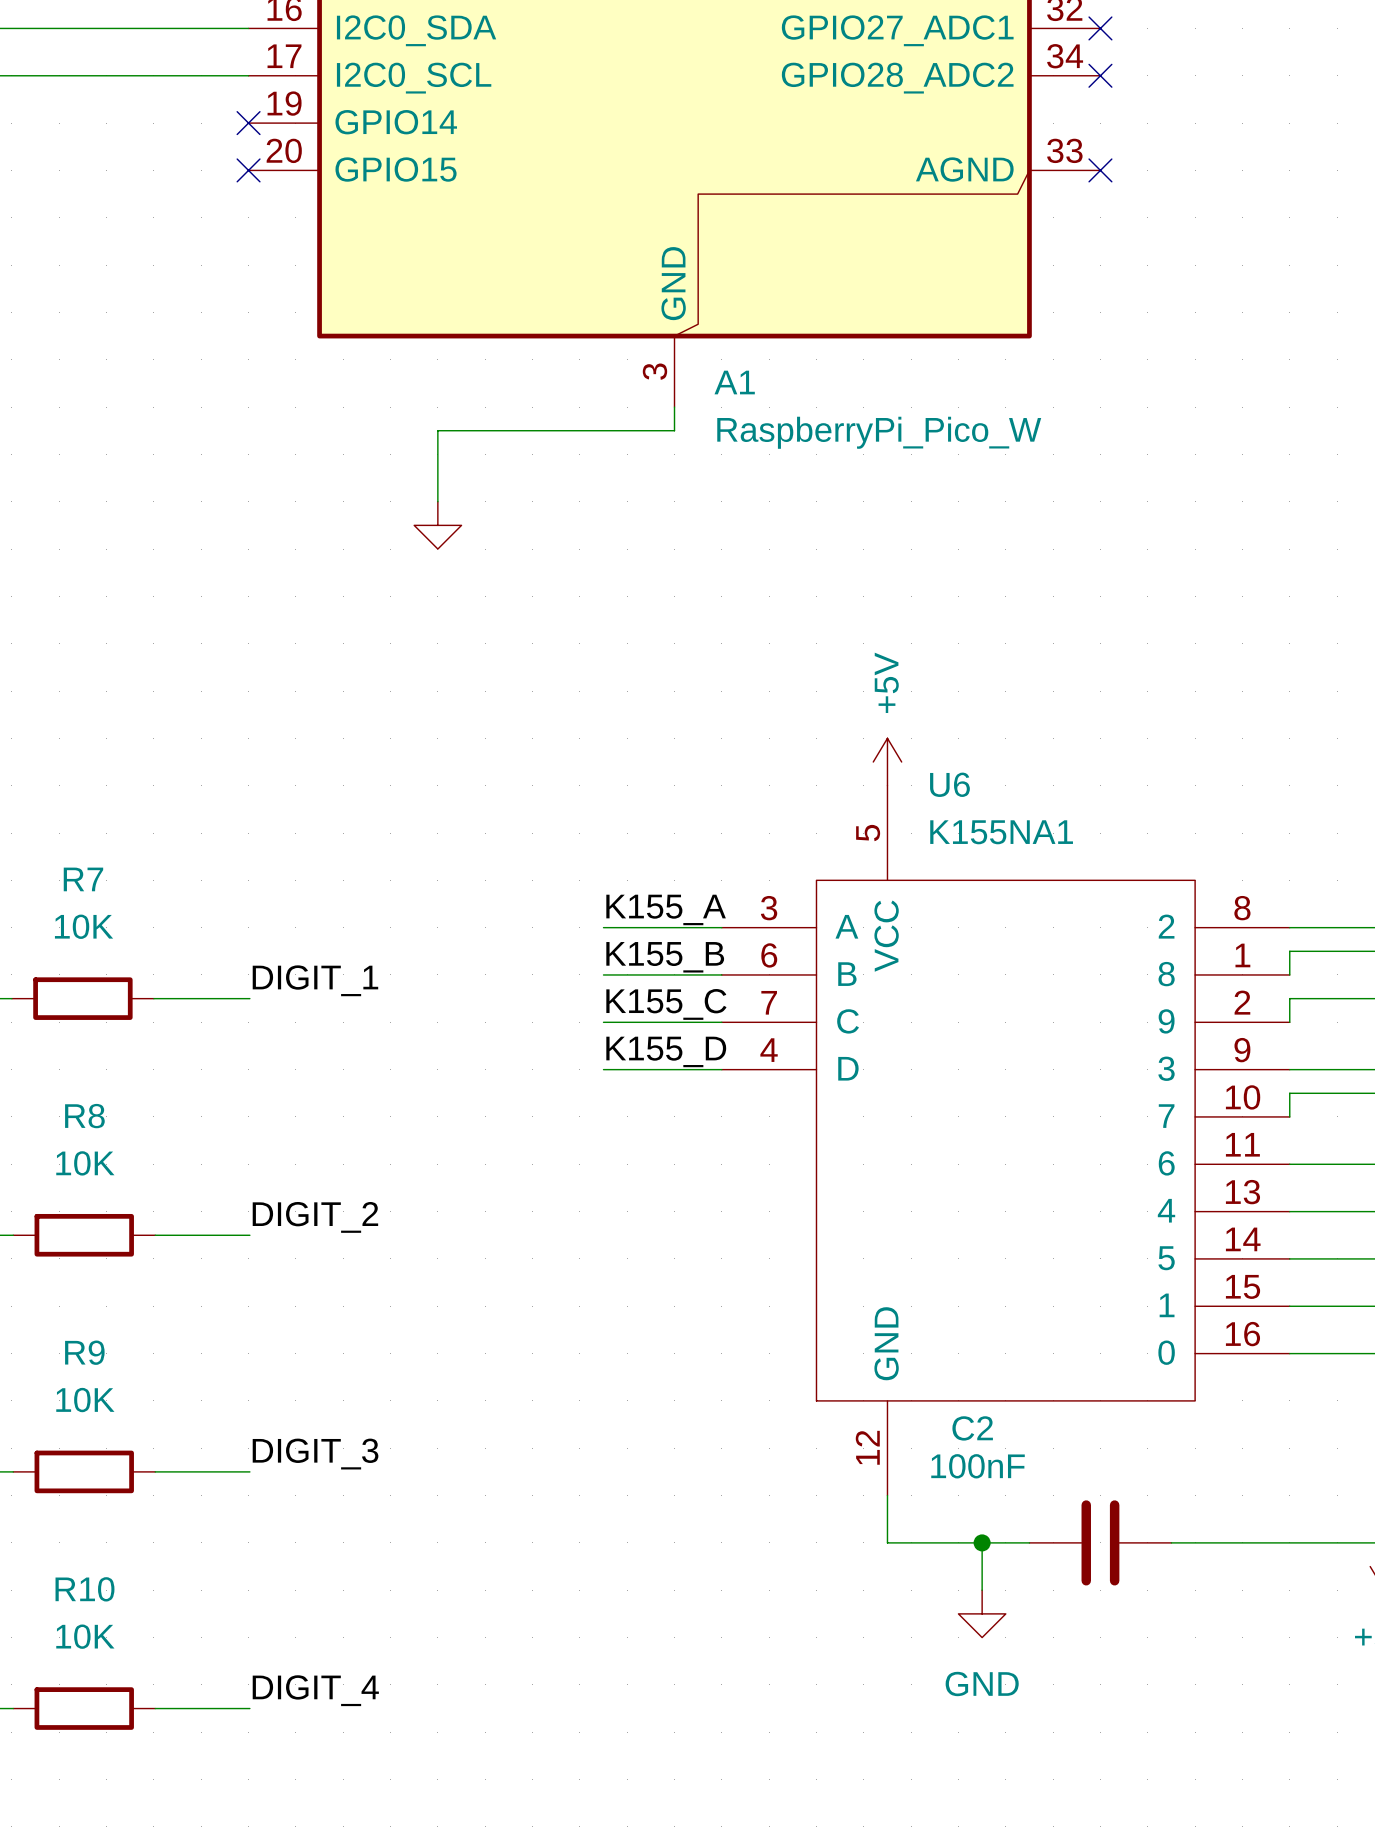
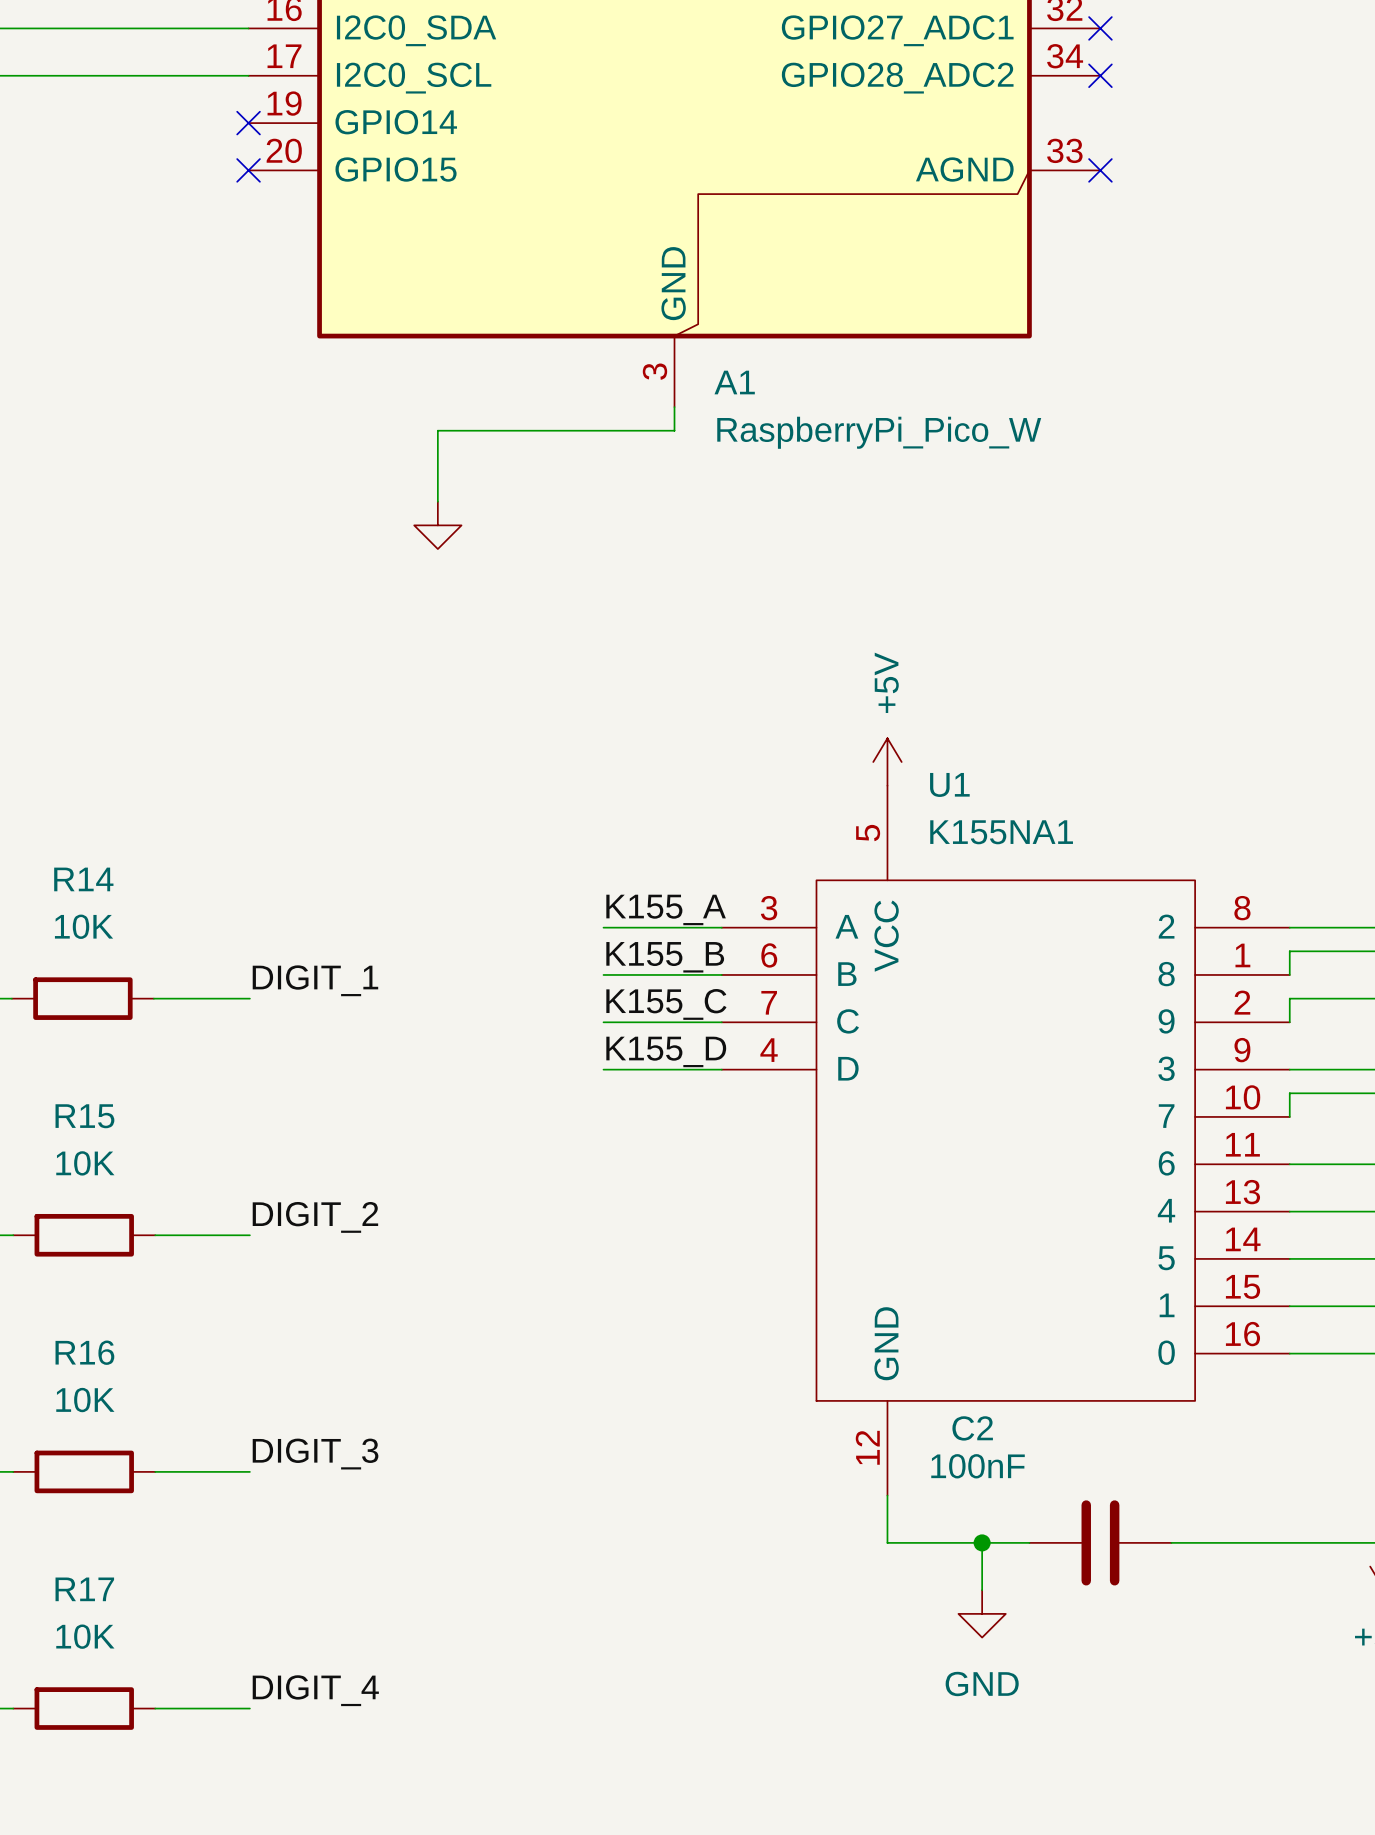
U6 name: U6 (949, 784) -> U1 (949, 784)
R7 name: R7 (83, 879) -> R14 (83, 879)
R8 name: R8 (84, 1116) -> R15 (84, 1116)
R9 name: R9 (84, 1352) -> R16 (84, 1352)
R10 name: R10 (84, 1589) -> R17 (84, 1589)

